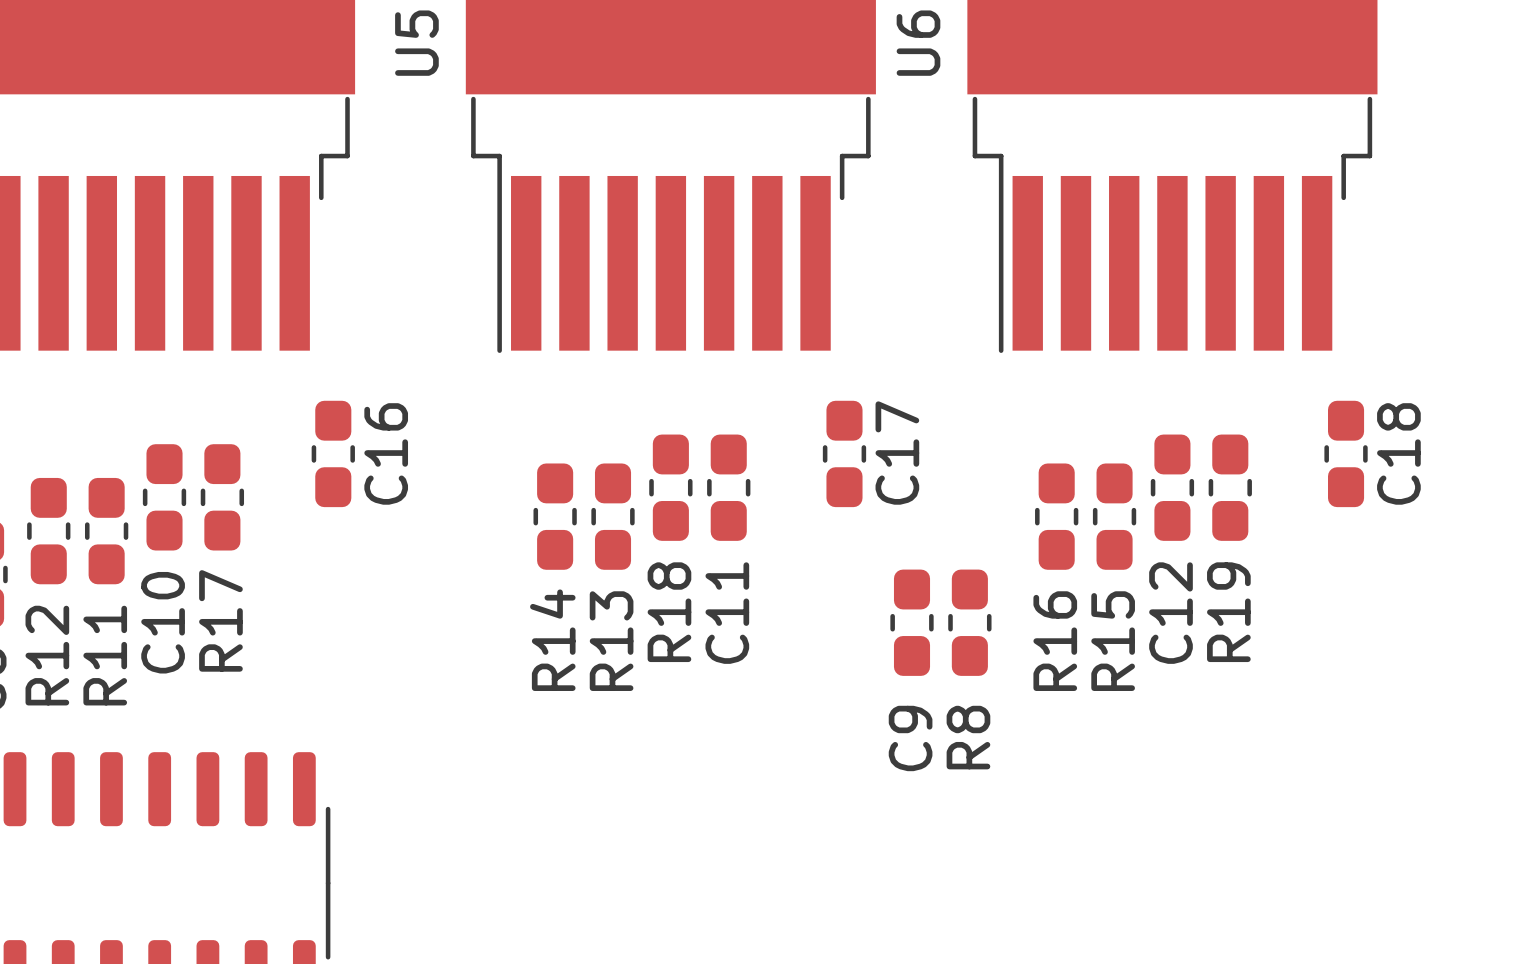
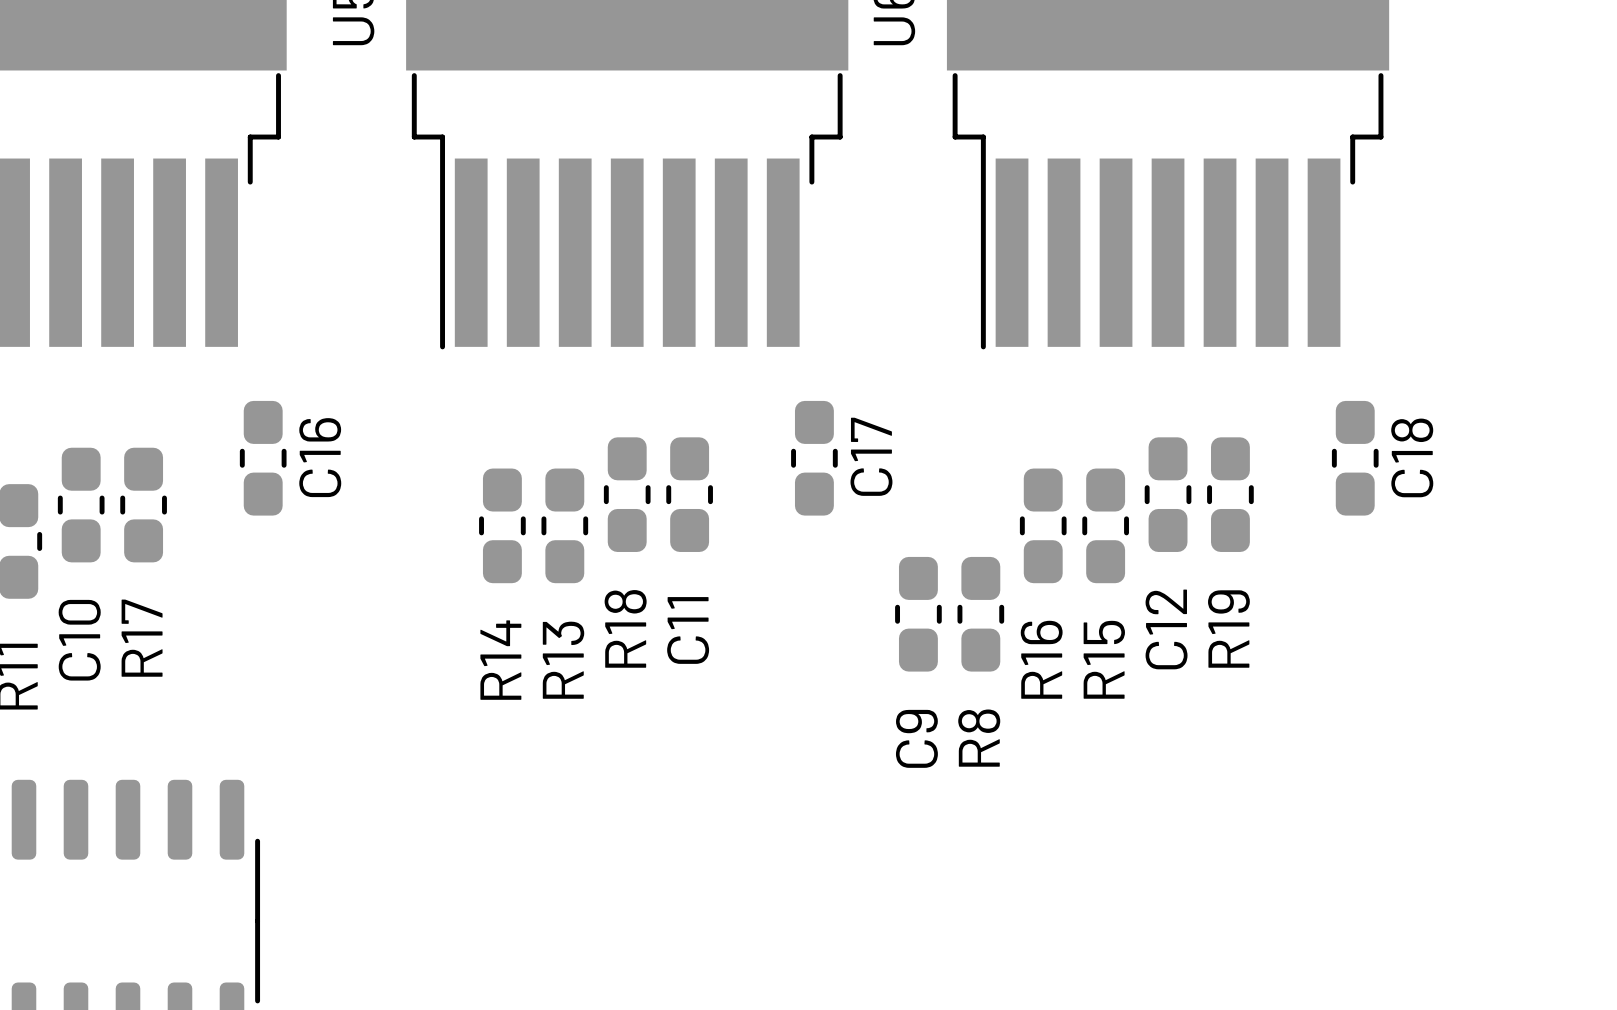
C9 position: (912, 622) -> (918, 614)
R8 position: (969, 622) -> (980, 614)

